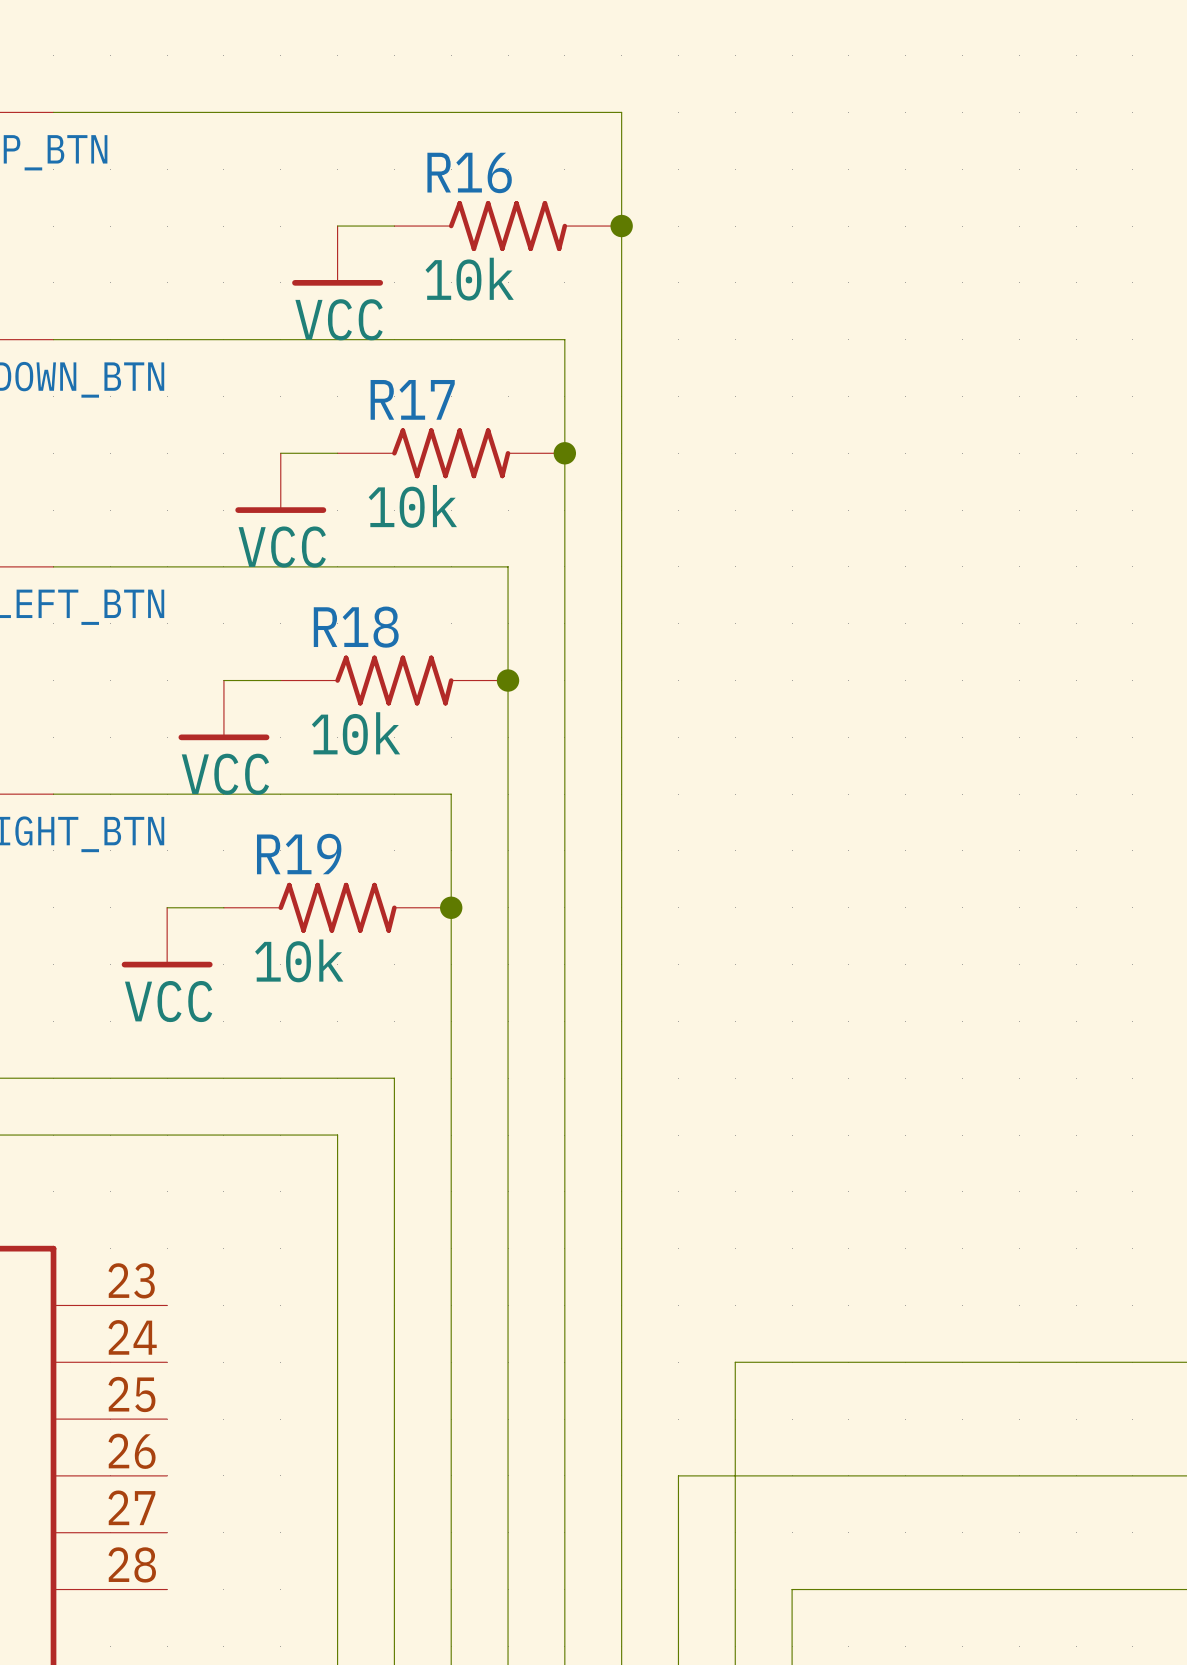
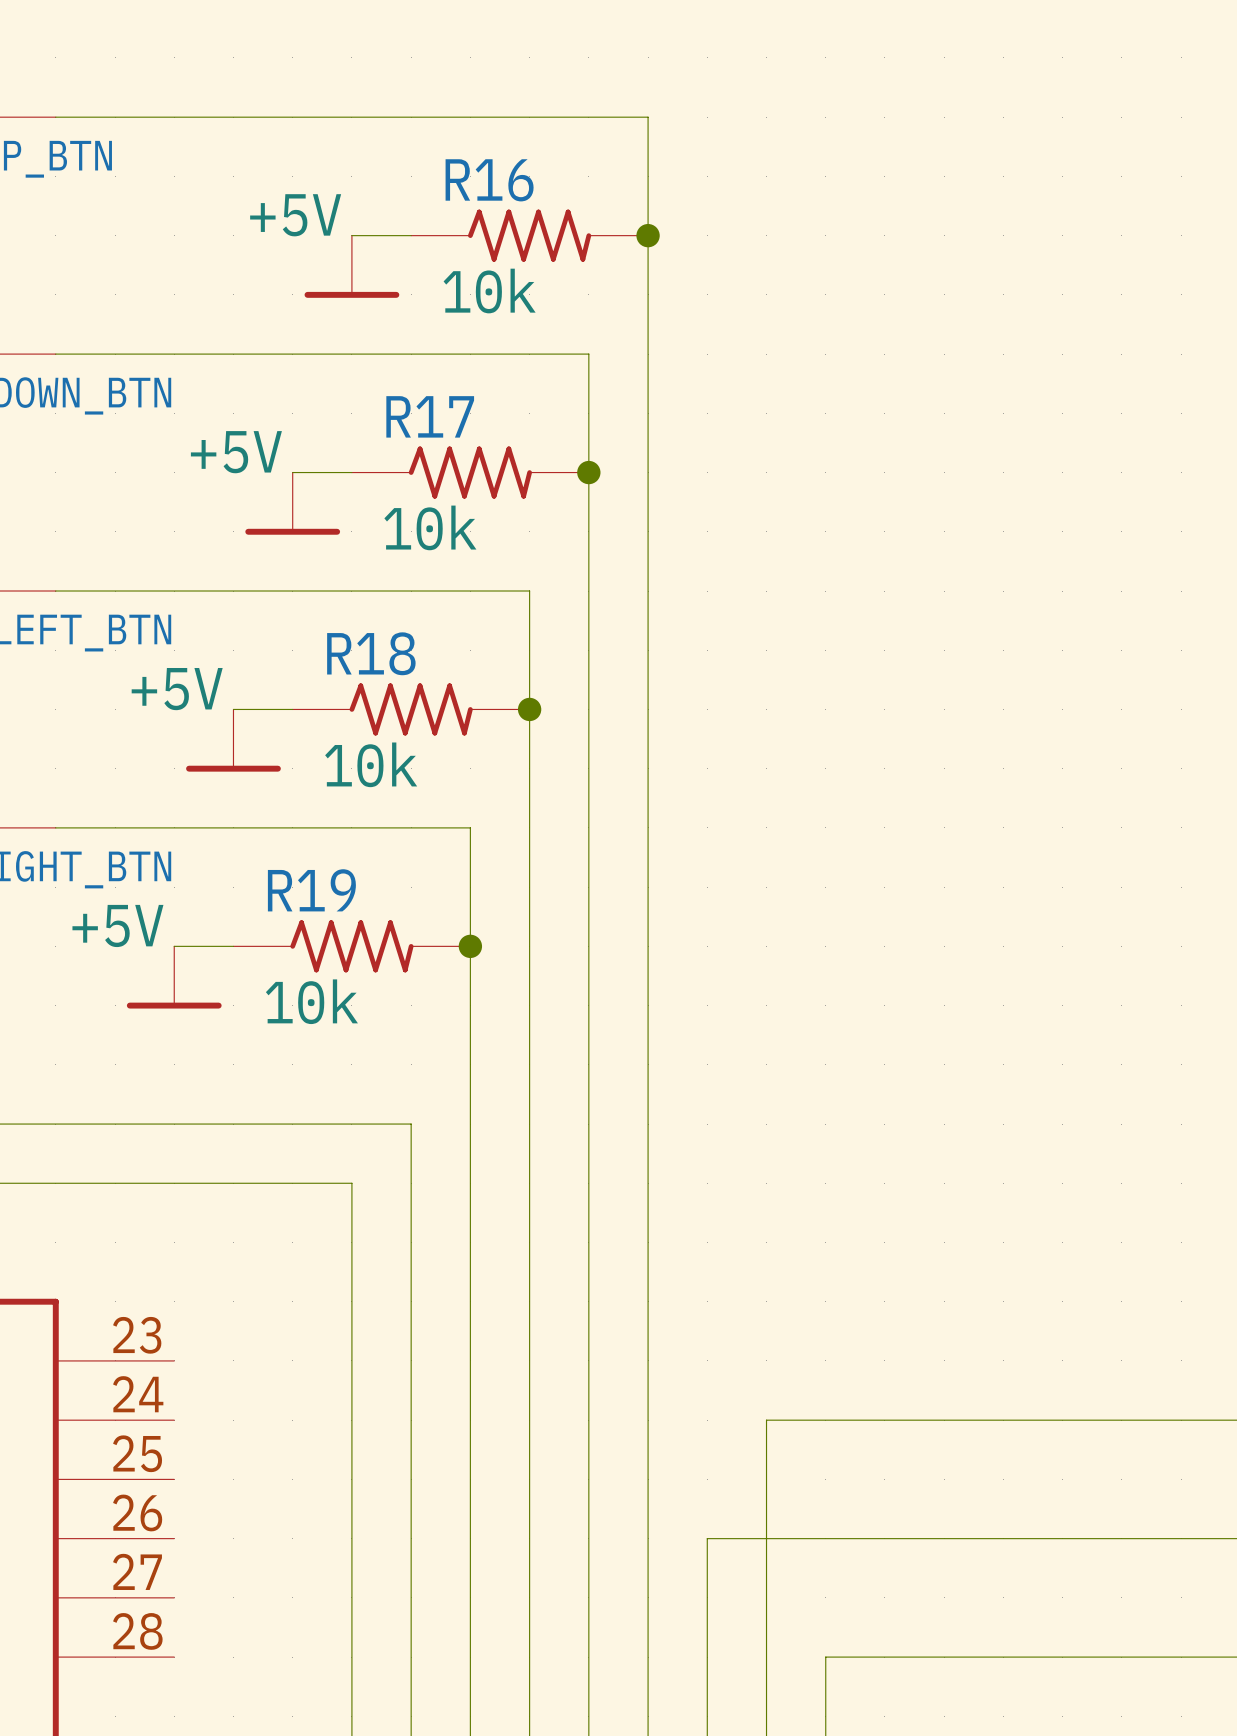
power symbol: VCC (337, 255) -> +5V (351, 266)
power symbol: VCC (280, 483) -> +5V (292, 503)
power symbol: VCC (223, 710) -> +5V (233, 740)
power symbol: VCC (167, 937) -> +5V (174, 977)

